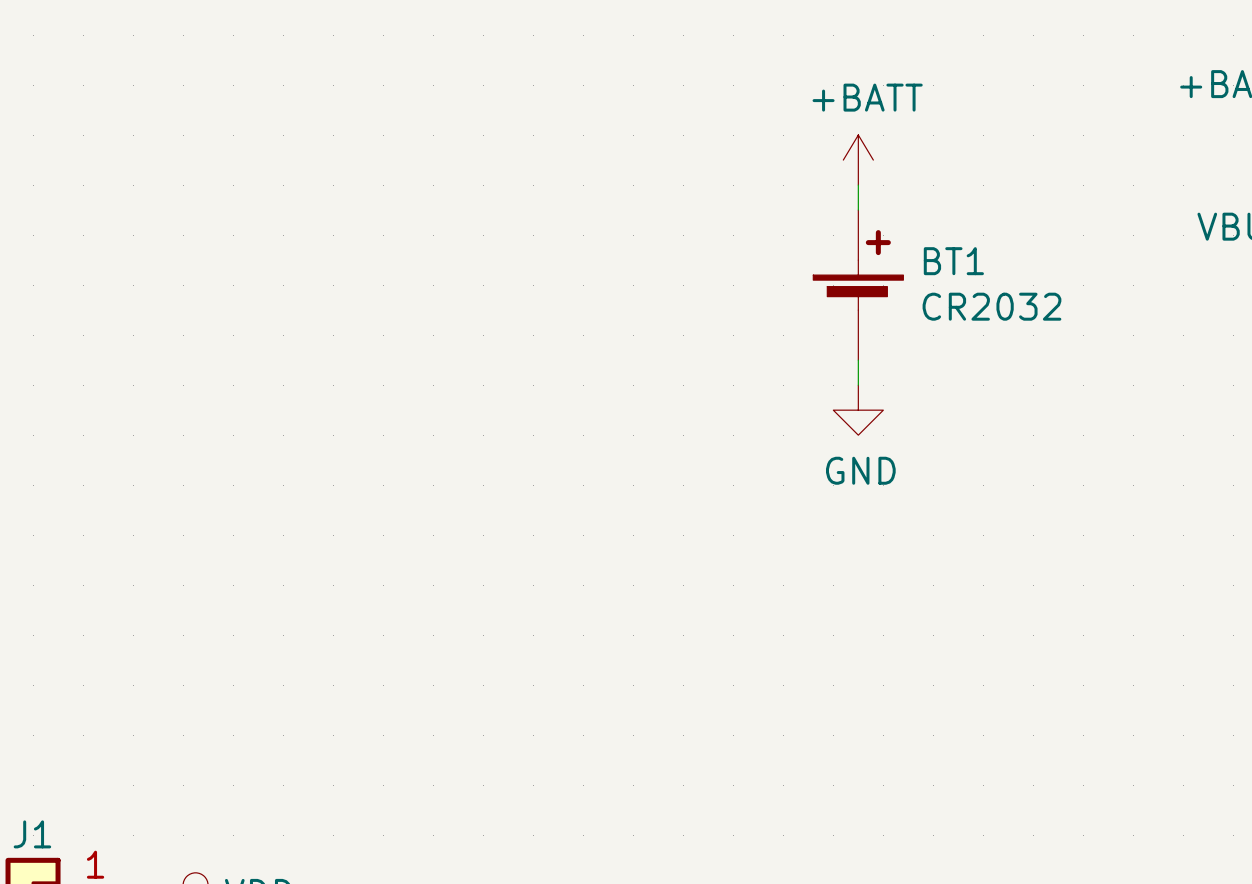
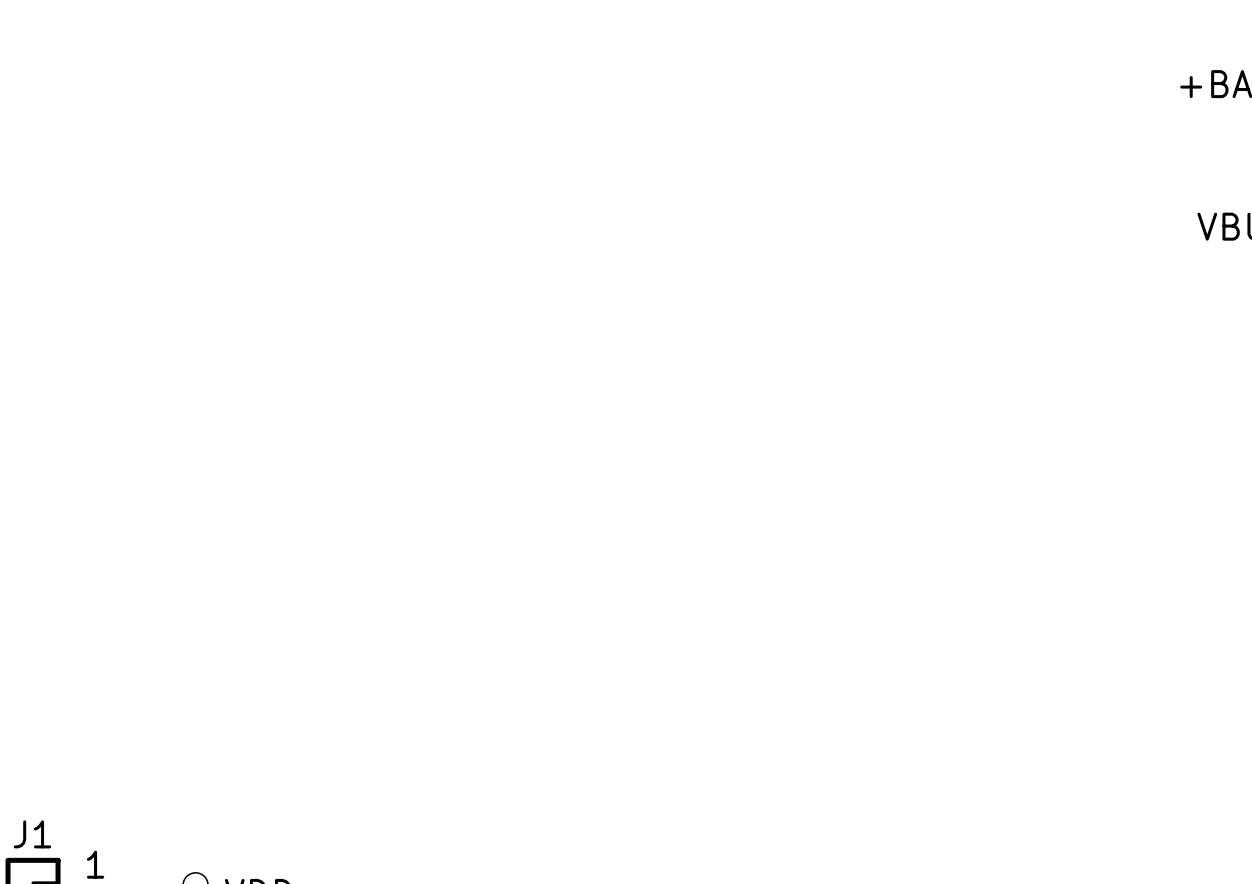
power symbol: +BATT (858, 160) -> none
wire: (858, 185) (858, 210) -> none
BT1: CR2032 (858, 285) -> none
wire: (858, 360) (858, 385) -> none
power symbol: GND (858, 410) -> none

